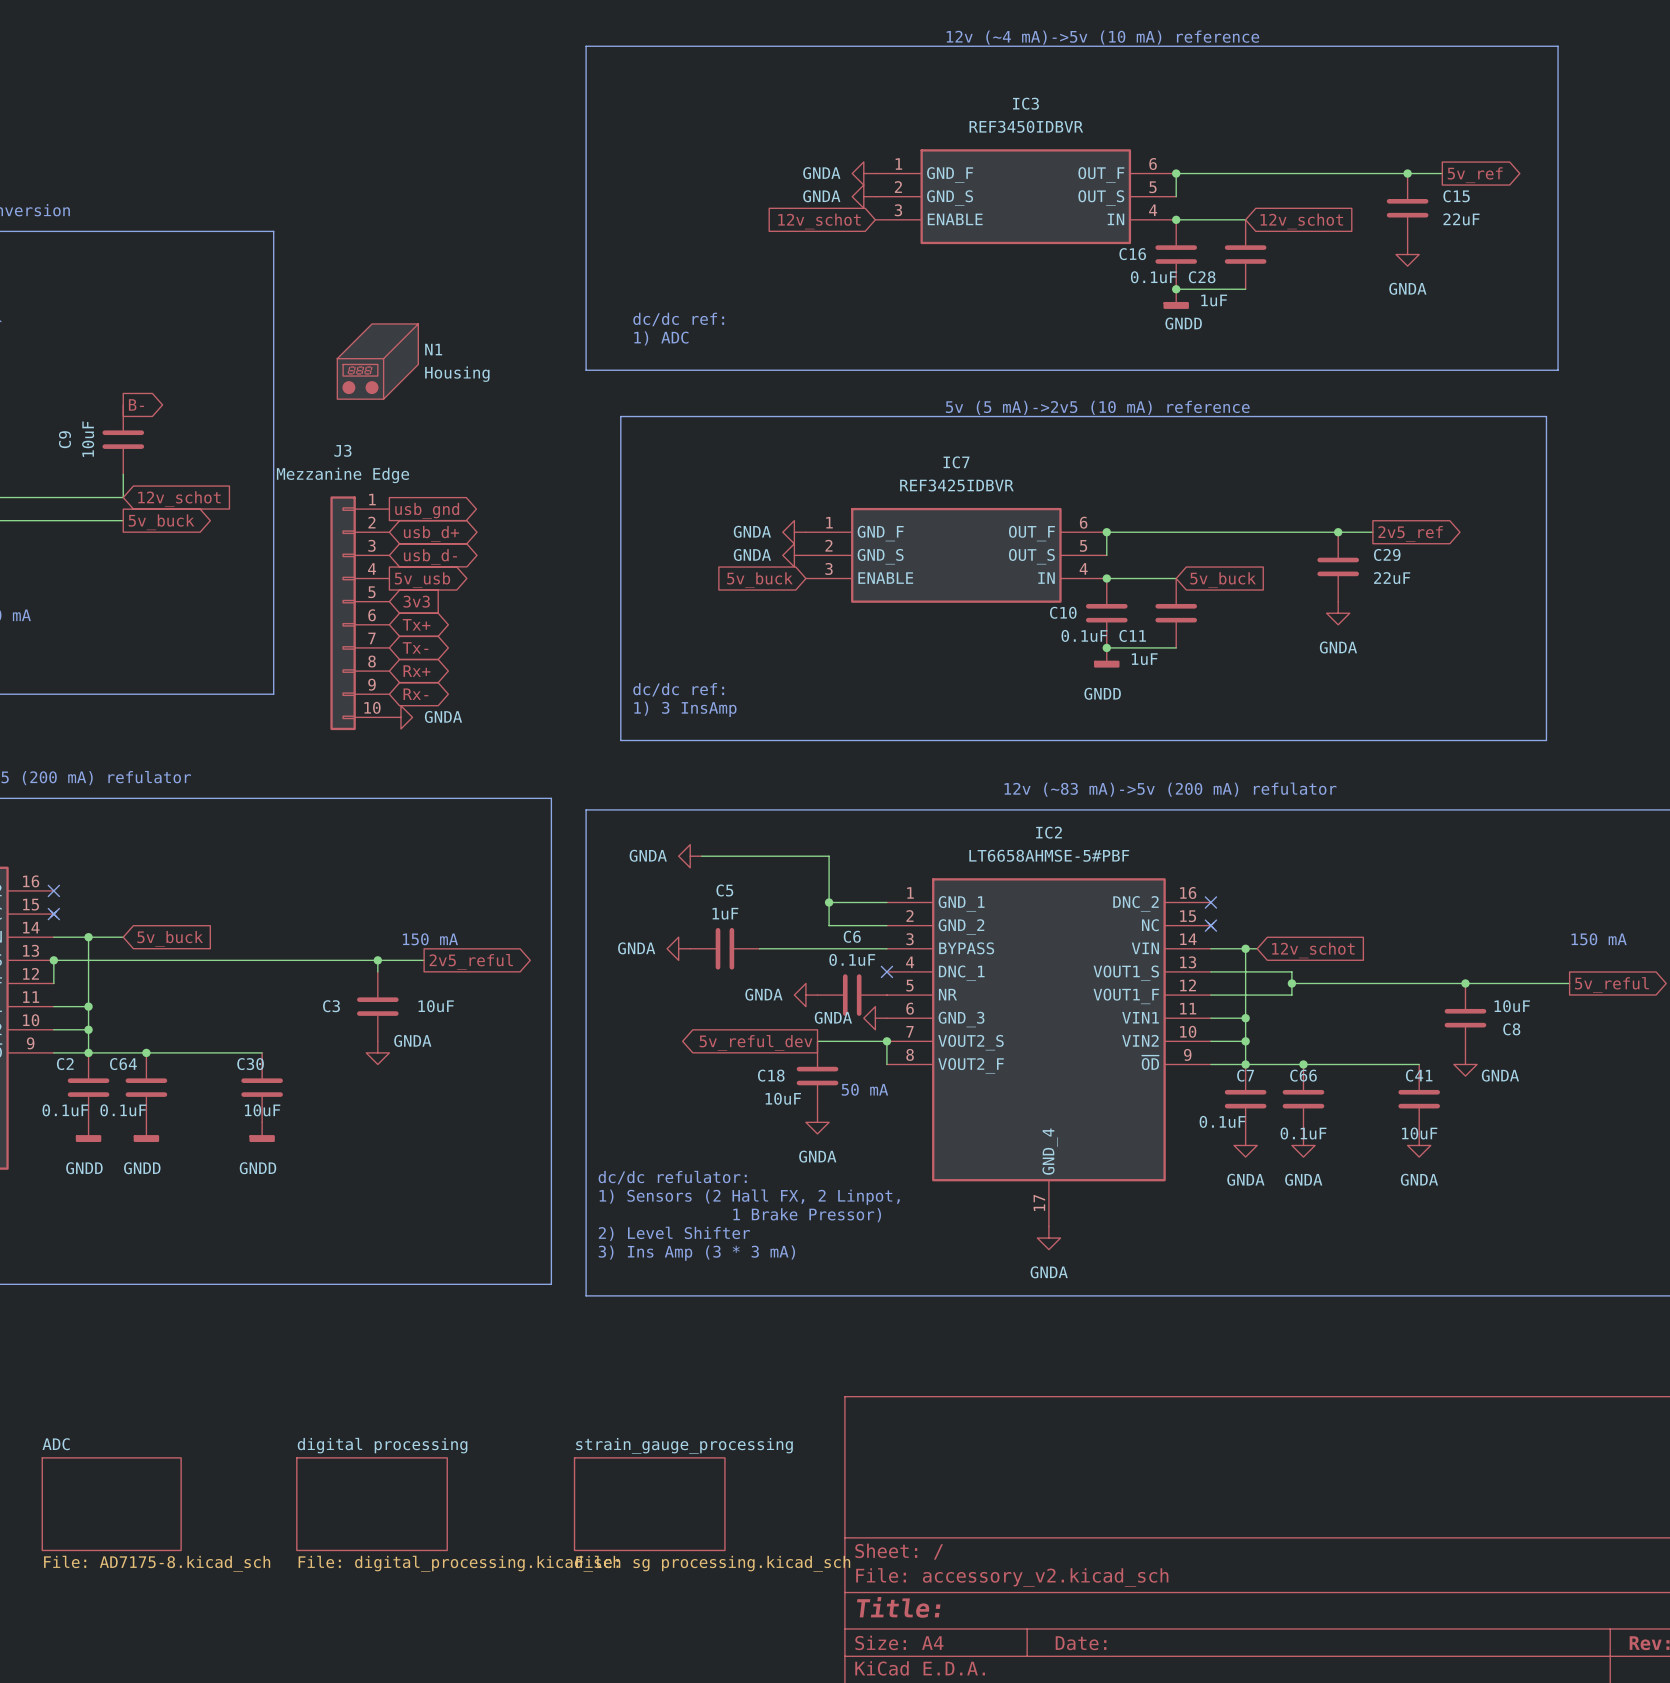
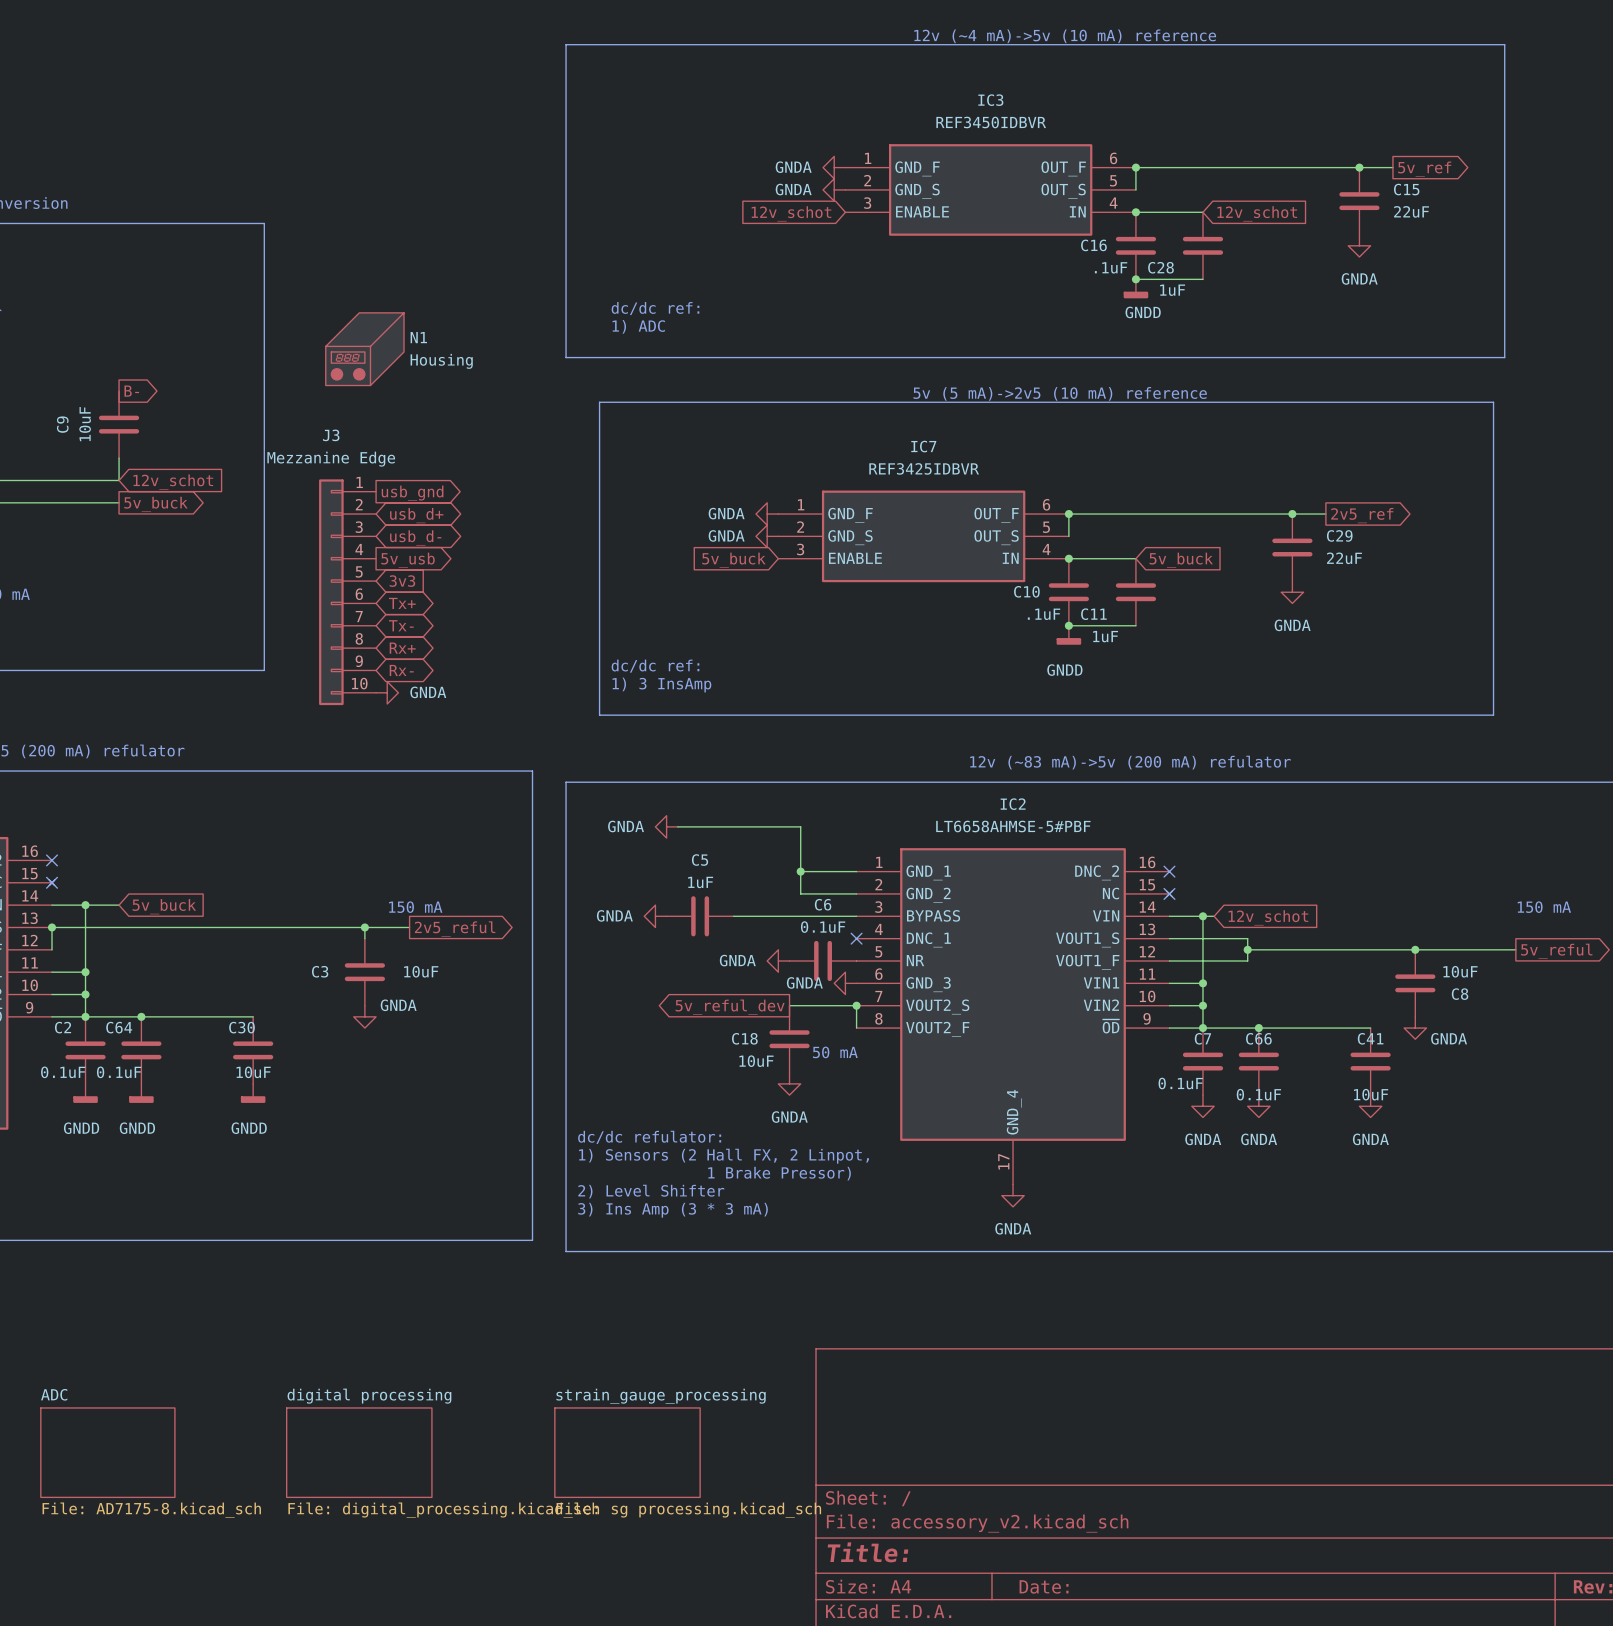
C16 value: 0.1uF (1153, 277) -> .1uF (1111, 267)
C10 value: 0.1uF (1084, 635) -> .1uF (1044, 614)

